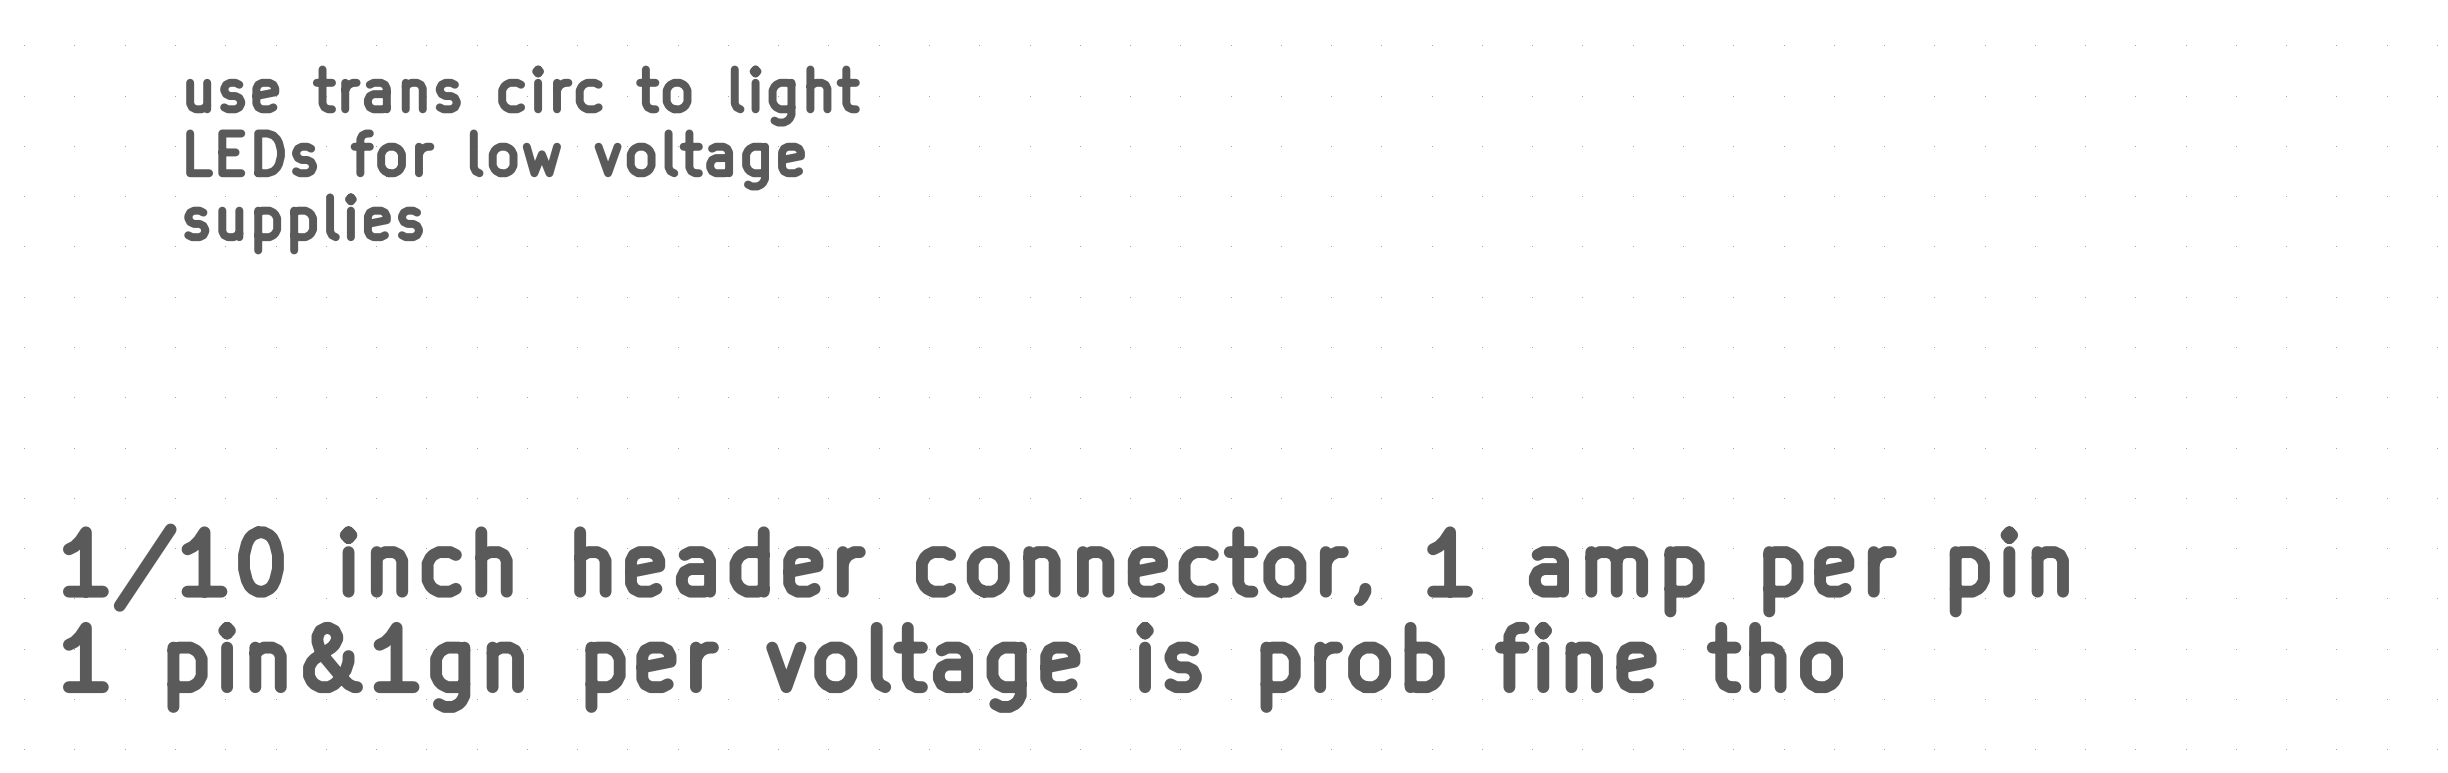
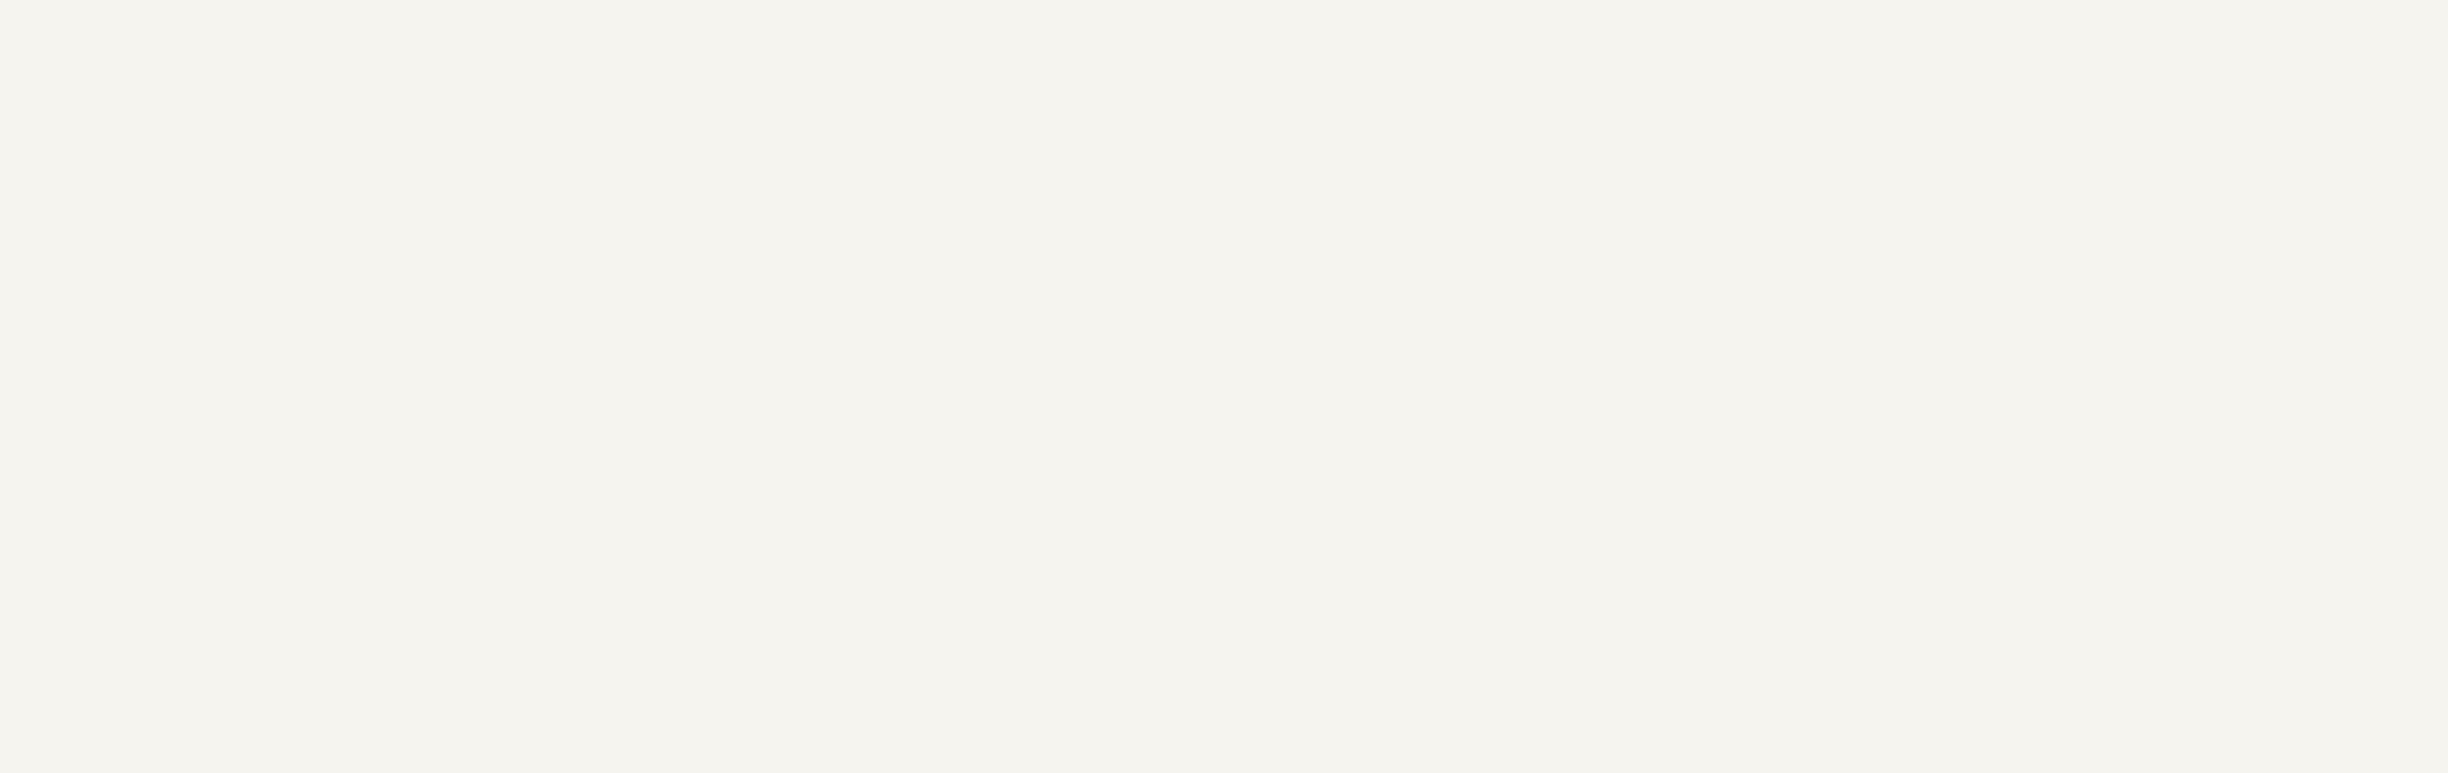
text: use trans circ to light (522, 96) -> none
text: LEDs for low voltage (495, 159) -> none
text: supplies (303, 223) -> none
text: 1/10 inch header connector, 1 amp per pin (1065, 570) -> none
text: 1 pin&1gn per voltage is prob fine tho (952, 667) -> none

